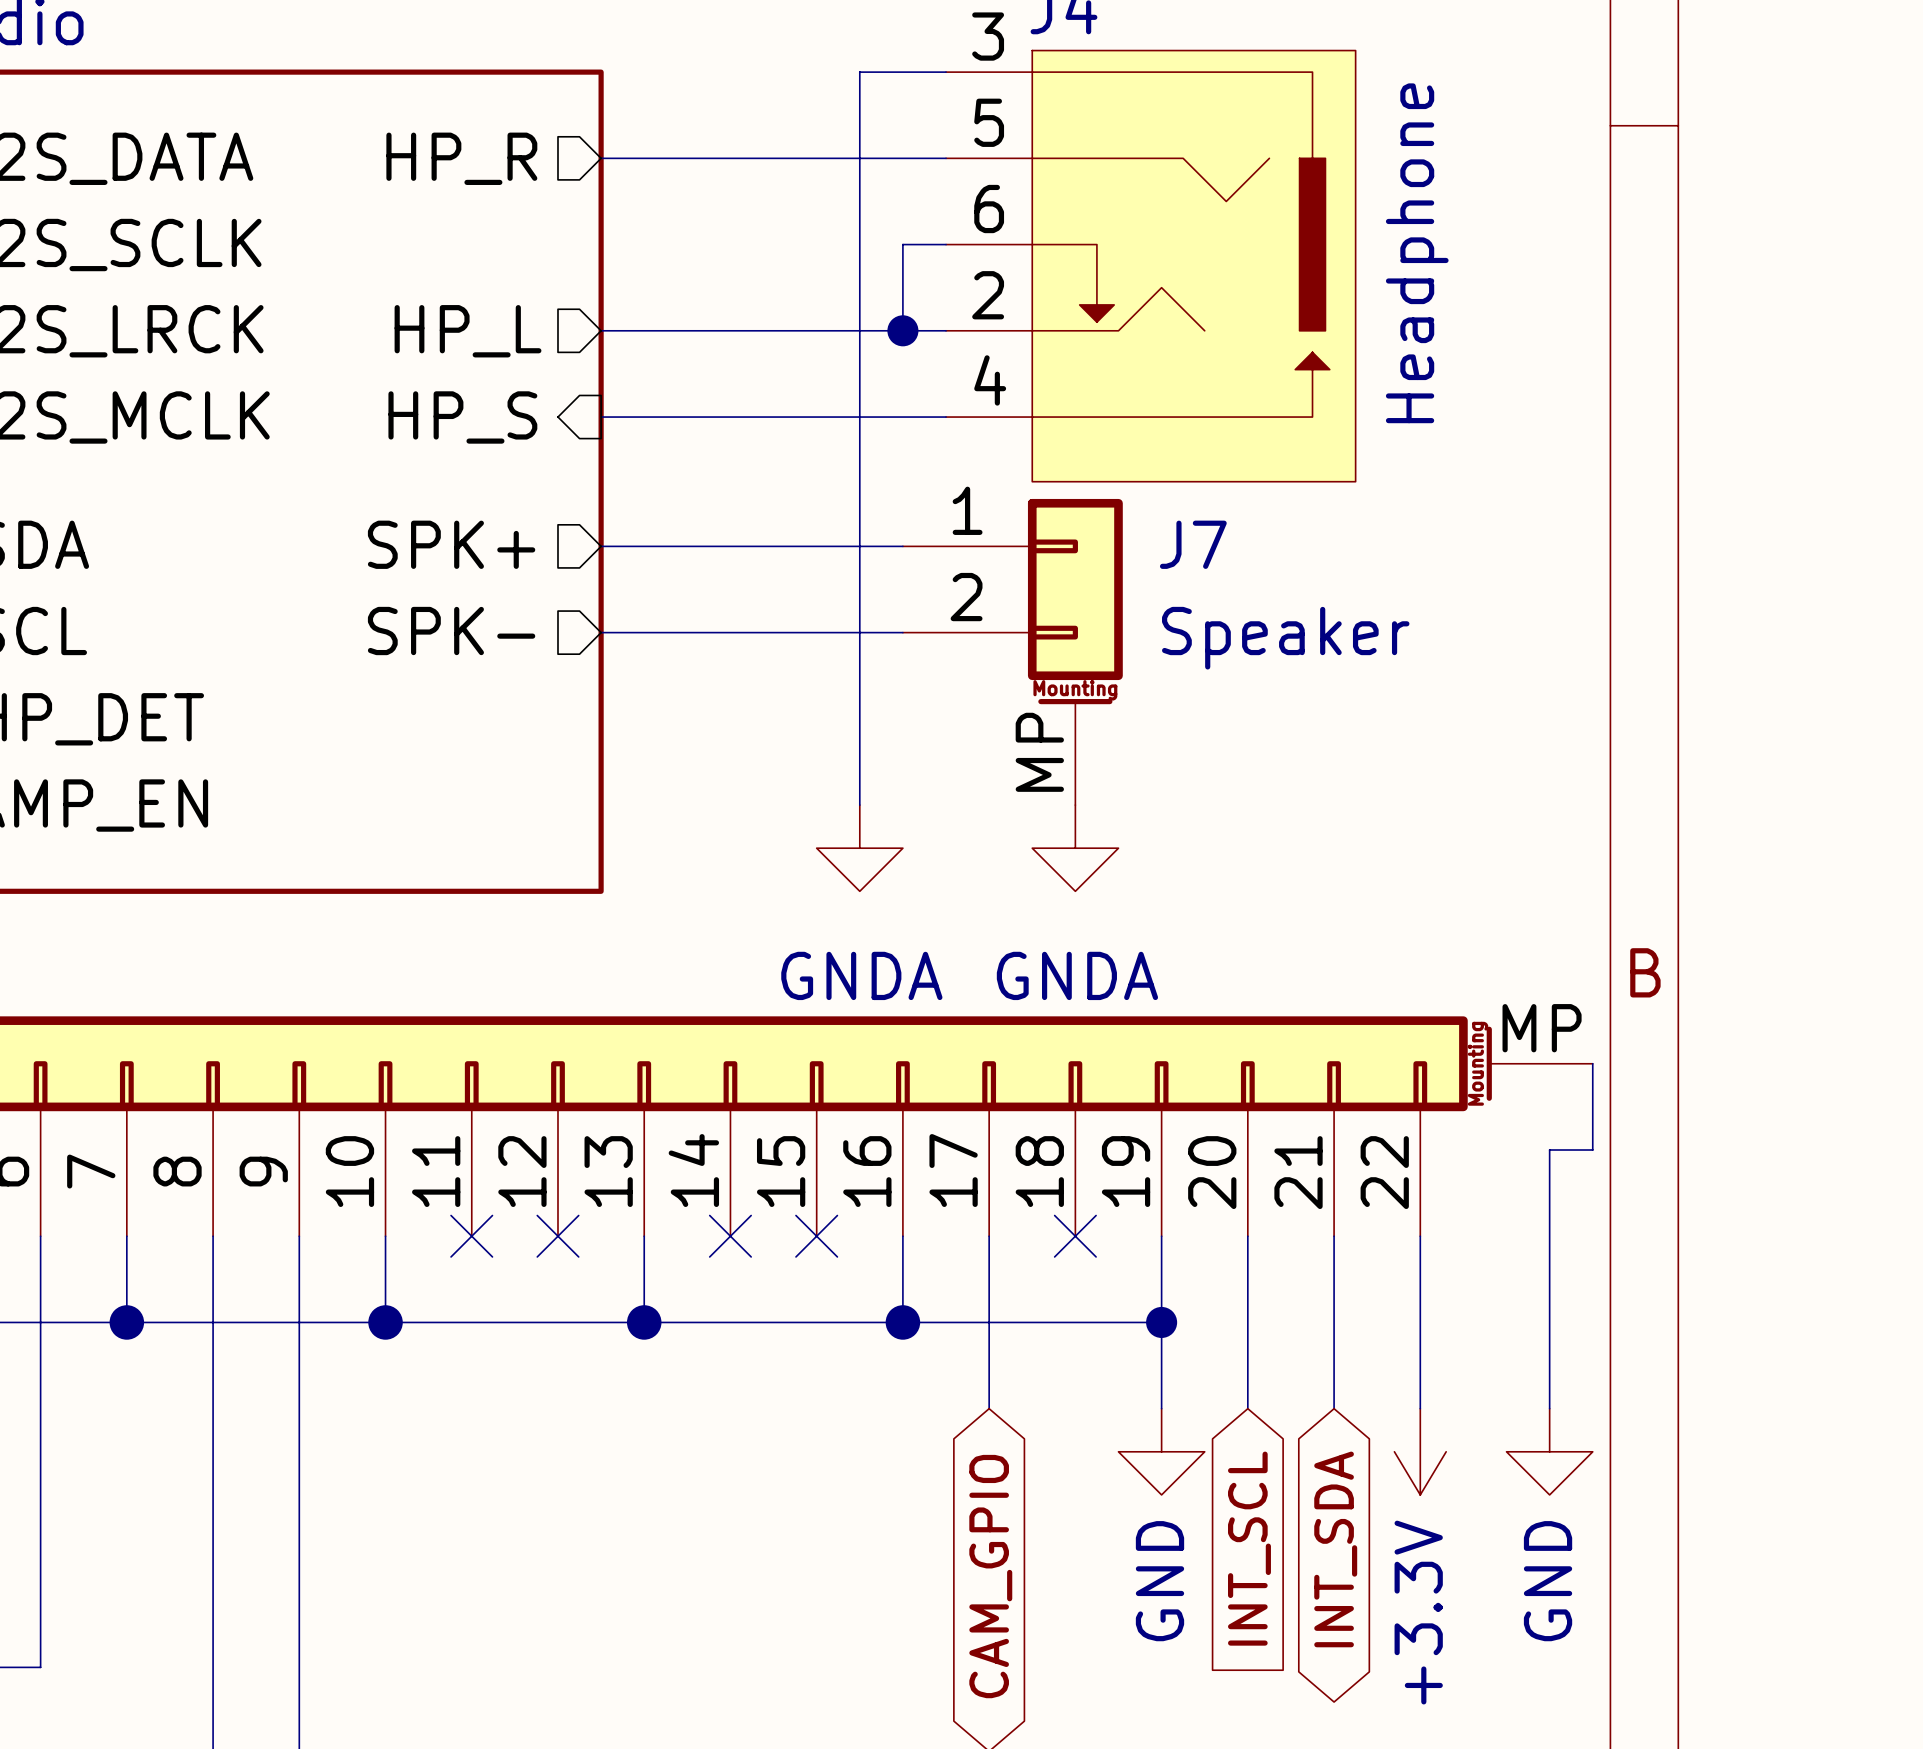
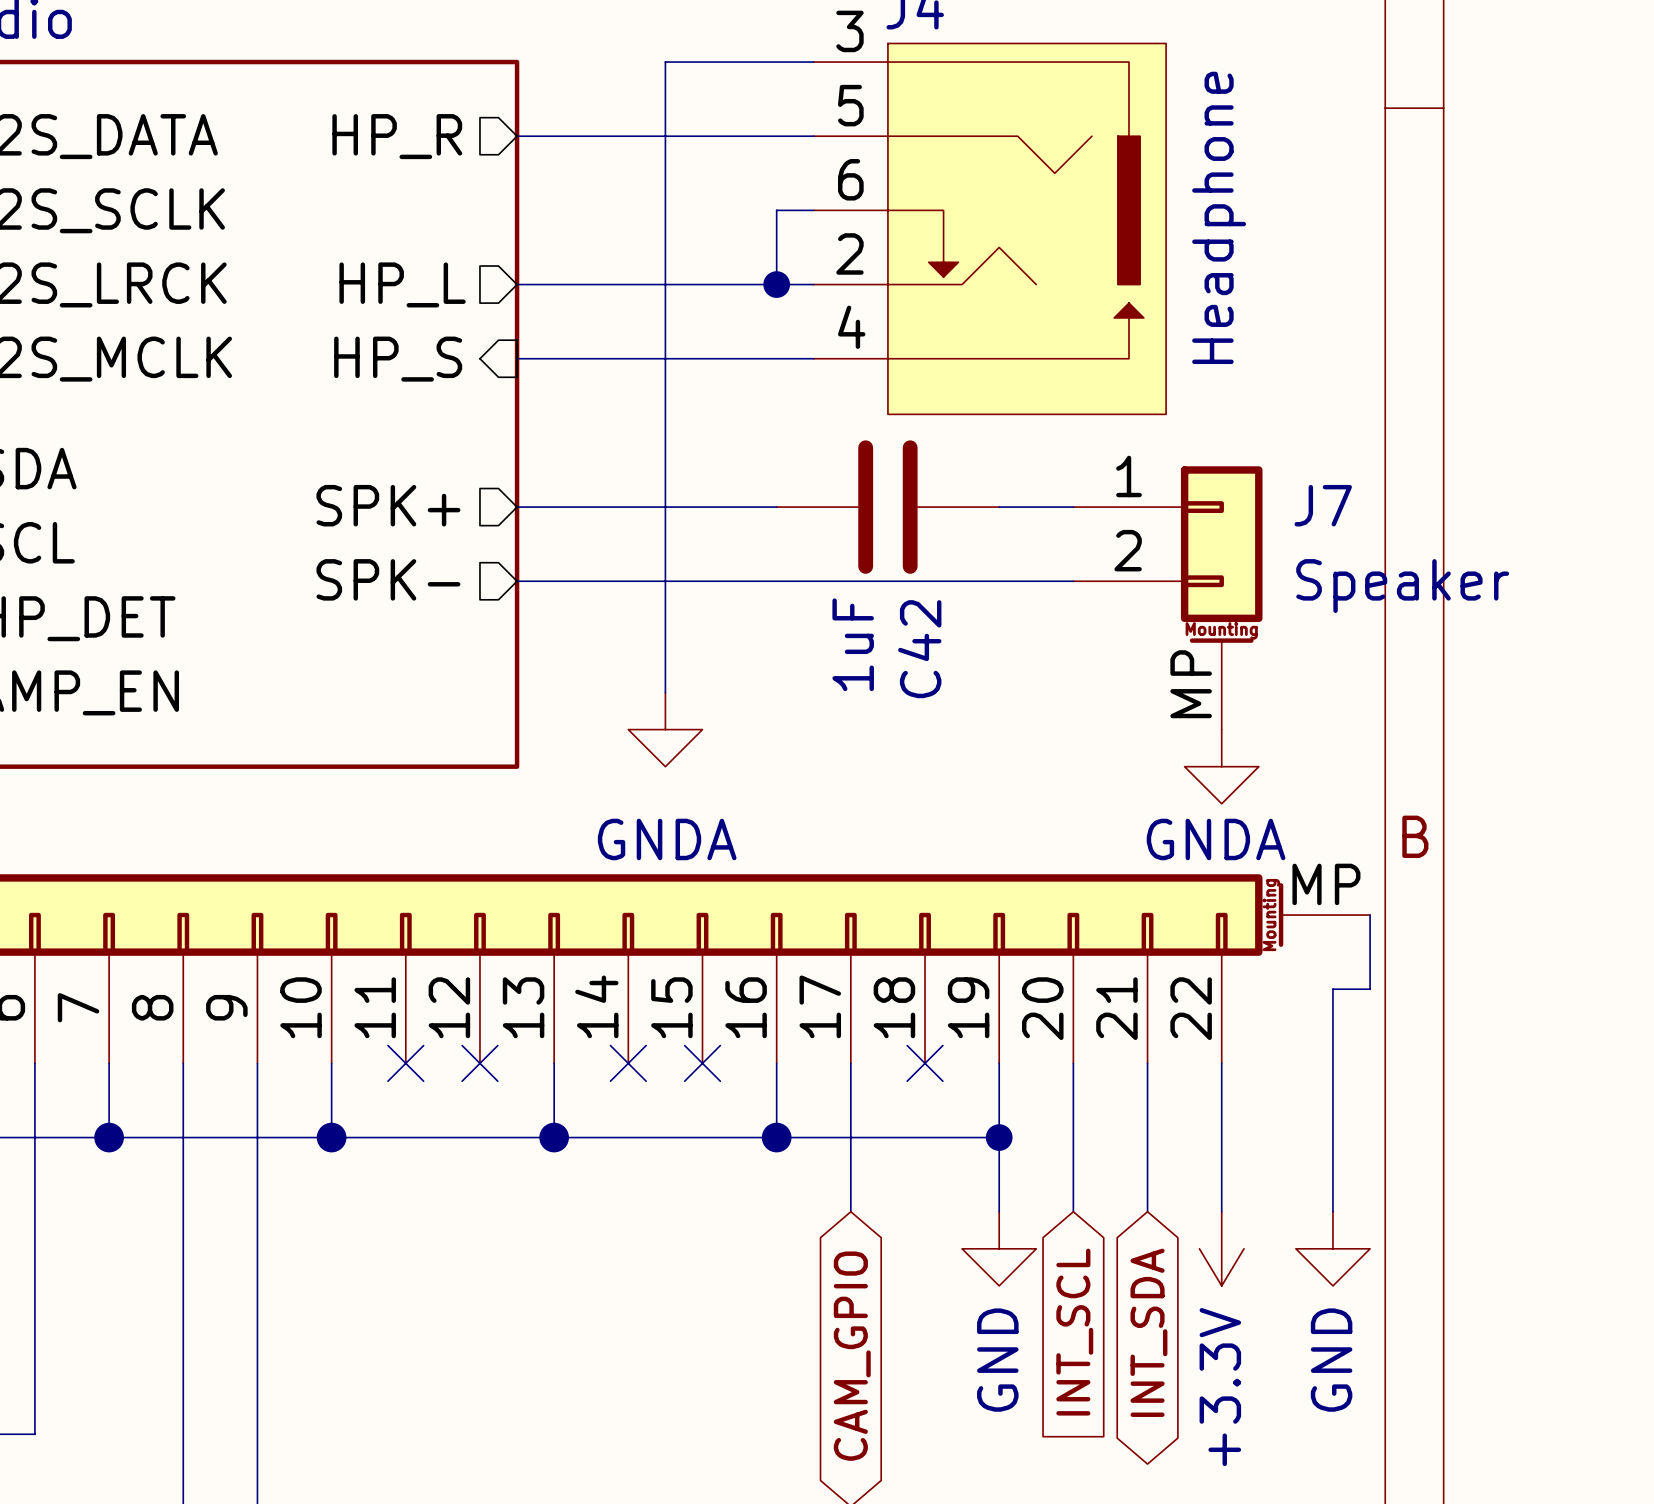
wire: (859, 72) (859, 805) -> (739, 62) (665, 62) (665, 692)
sheet pin position: SPK+ (451, 544) -> SPK+ (388, 505)
wire: (601, 546) (902, 546) -> (517, 507) (776, 507)
C42: none -> 1uF (887, 507)
wire: none -> (999, 507) (1073, 507)
sheet pin position: SPK- (451, 631) -> SPK- (388, 579)
wire: (601, 632) (902, 632) -> none
J7 position: (1012, 652) -> (1167, 597)
wire: none -> (517, 581) (1073, 581)
power symbol position: GNDA (859, 848) -> GNDA (665, 729)
power symbol: GNDA (1075, 848) -> none
power symbol: none -> GNDA (1221, 766)

